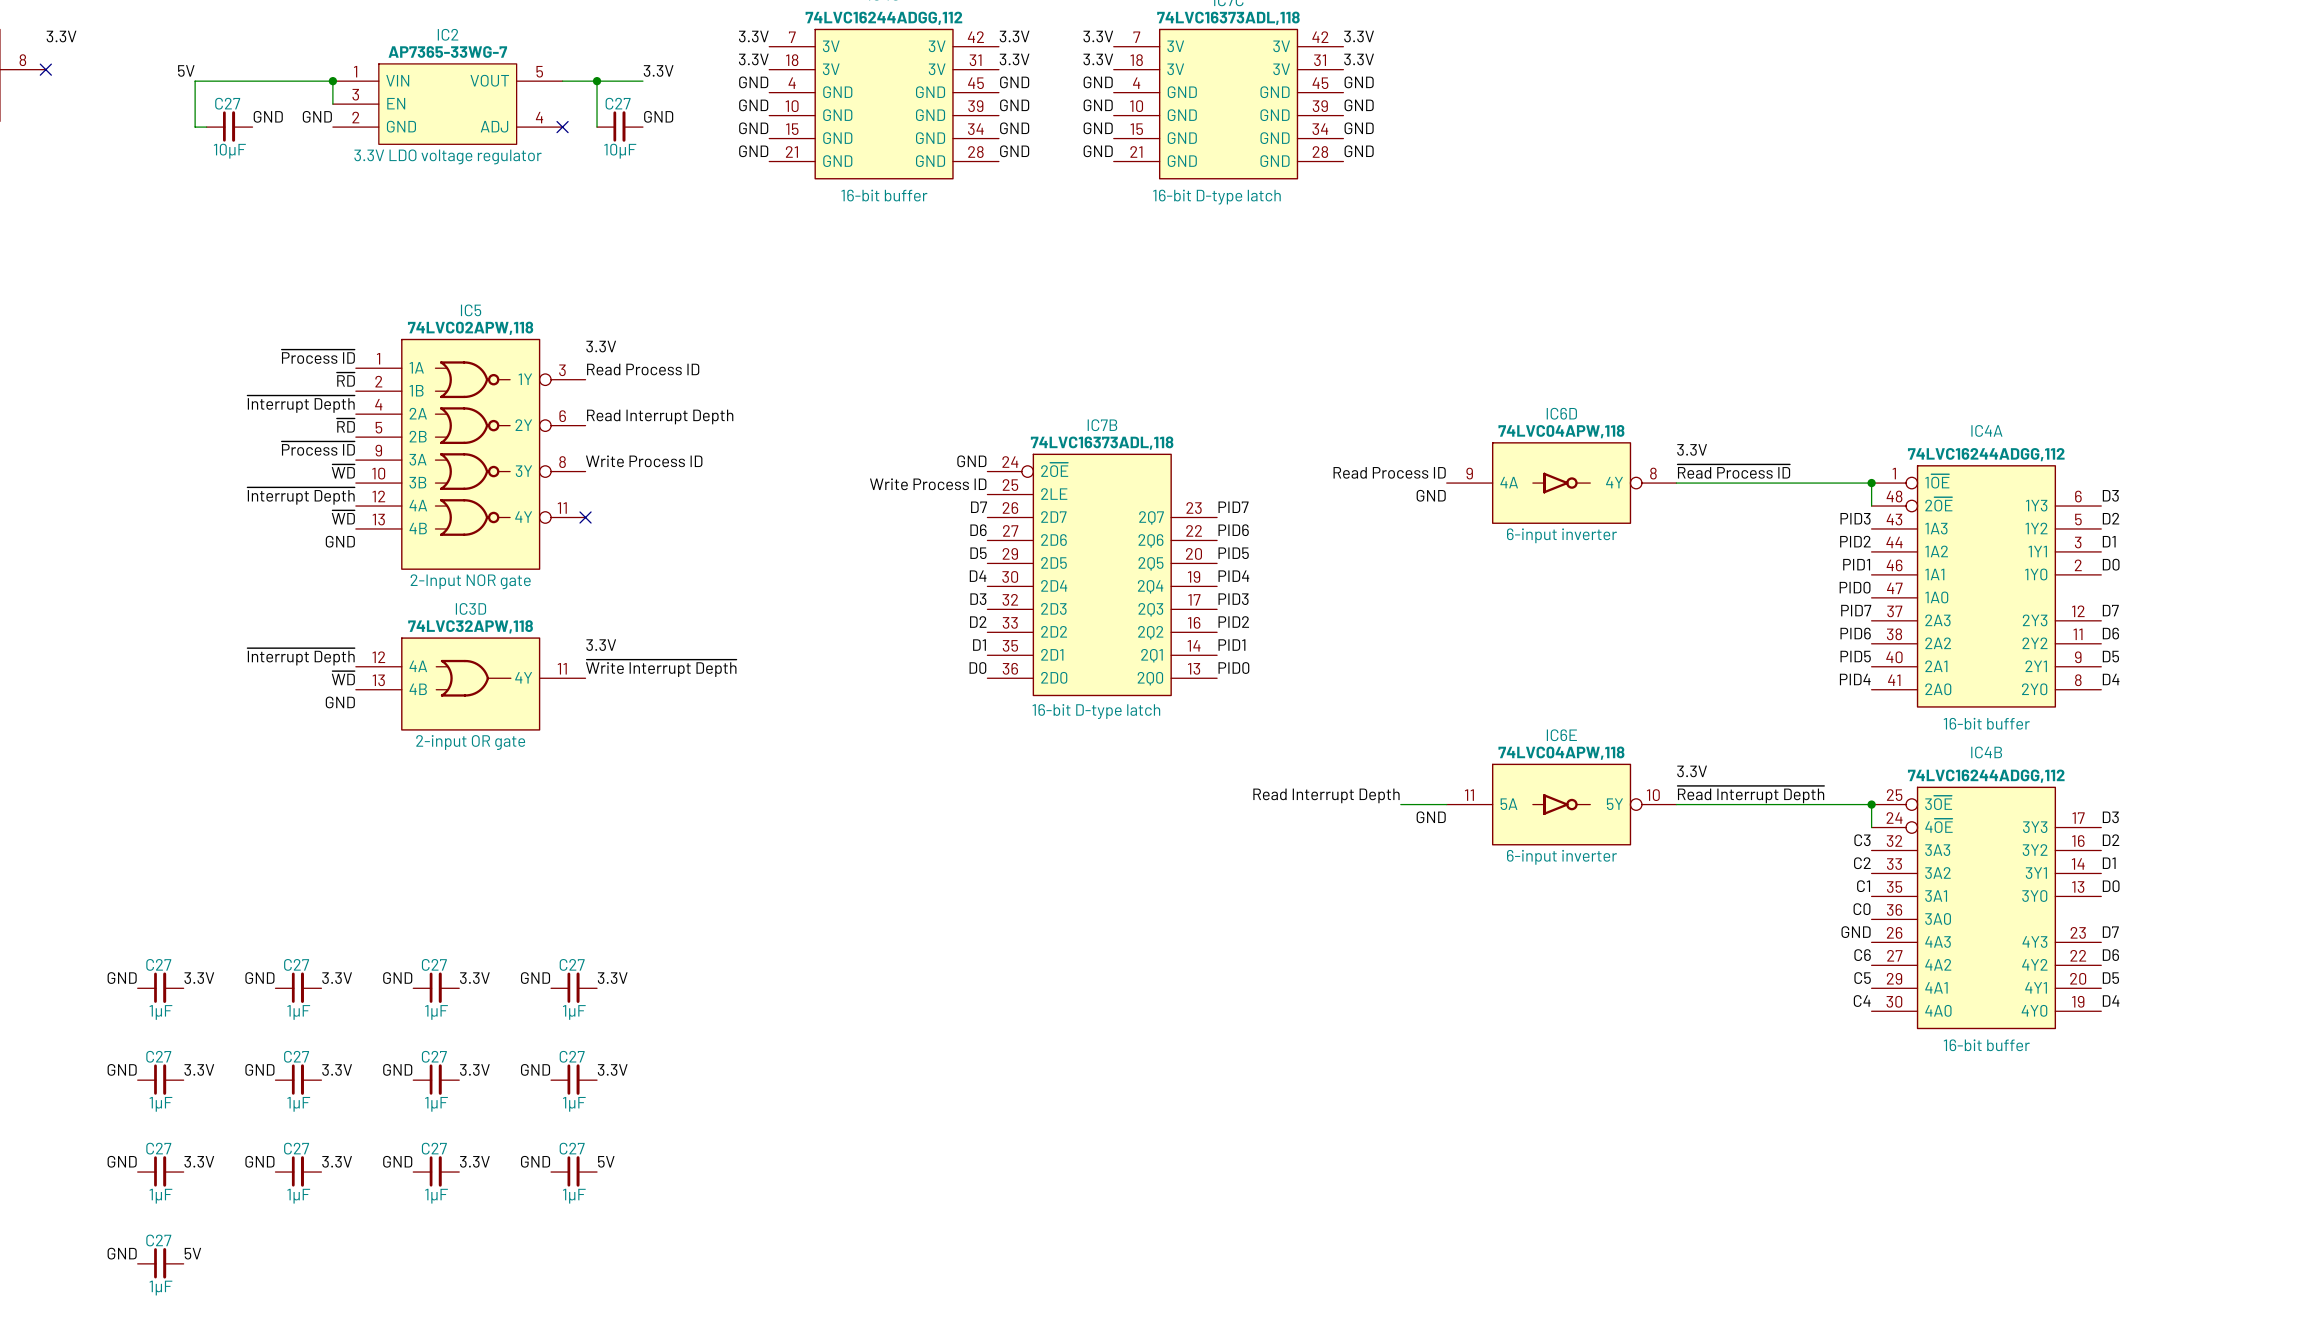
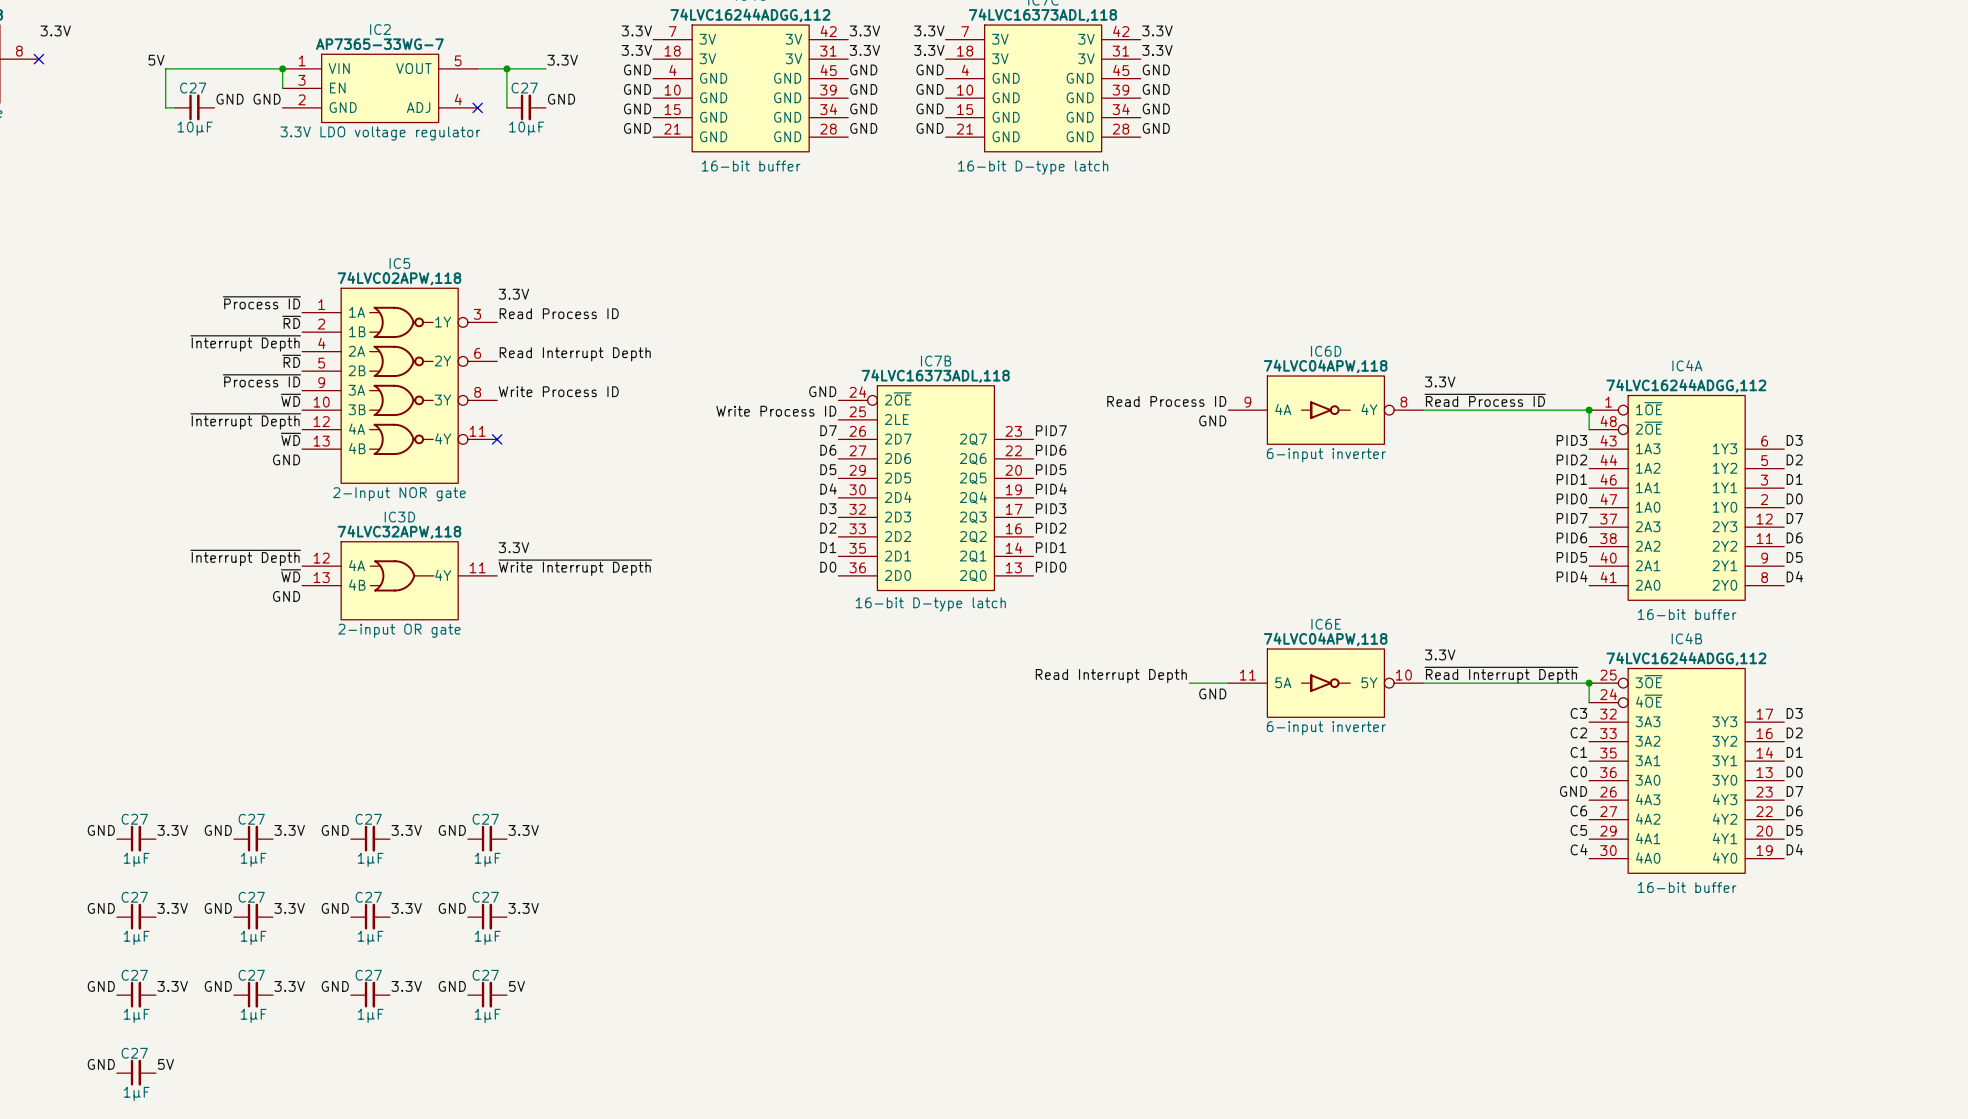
IC4A symbol: [1871, 465, 2102, 708] -> [1589, 394, 1785, 601]
label: D3 (2110, 495) -> none
label: D2 (2111, 518) -> D3 (1794, 440)
label: D1 (2109, 541) -> D2 (1794, 459)
label: D0 (2111, 564) -> D1 (1794, 479)
label: none -> D0 (1794, 498)
IC4B symbol: [1871, 786, 2102, 1030] -> [1589, 667, 1785, 874]
label: D3 (2110, 817) -> none
label: D2 (2111, 840) -> D3 (1794, 713)
label: D1 (2109, 863) -> D2 (1794, 732)
label: D0 (2111, 886) -> D1 (1794, 752)
label: none -> D0 (1794, 771)

